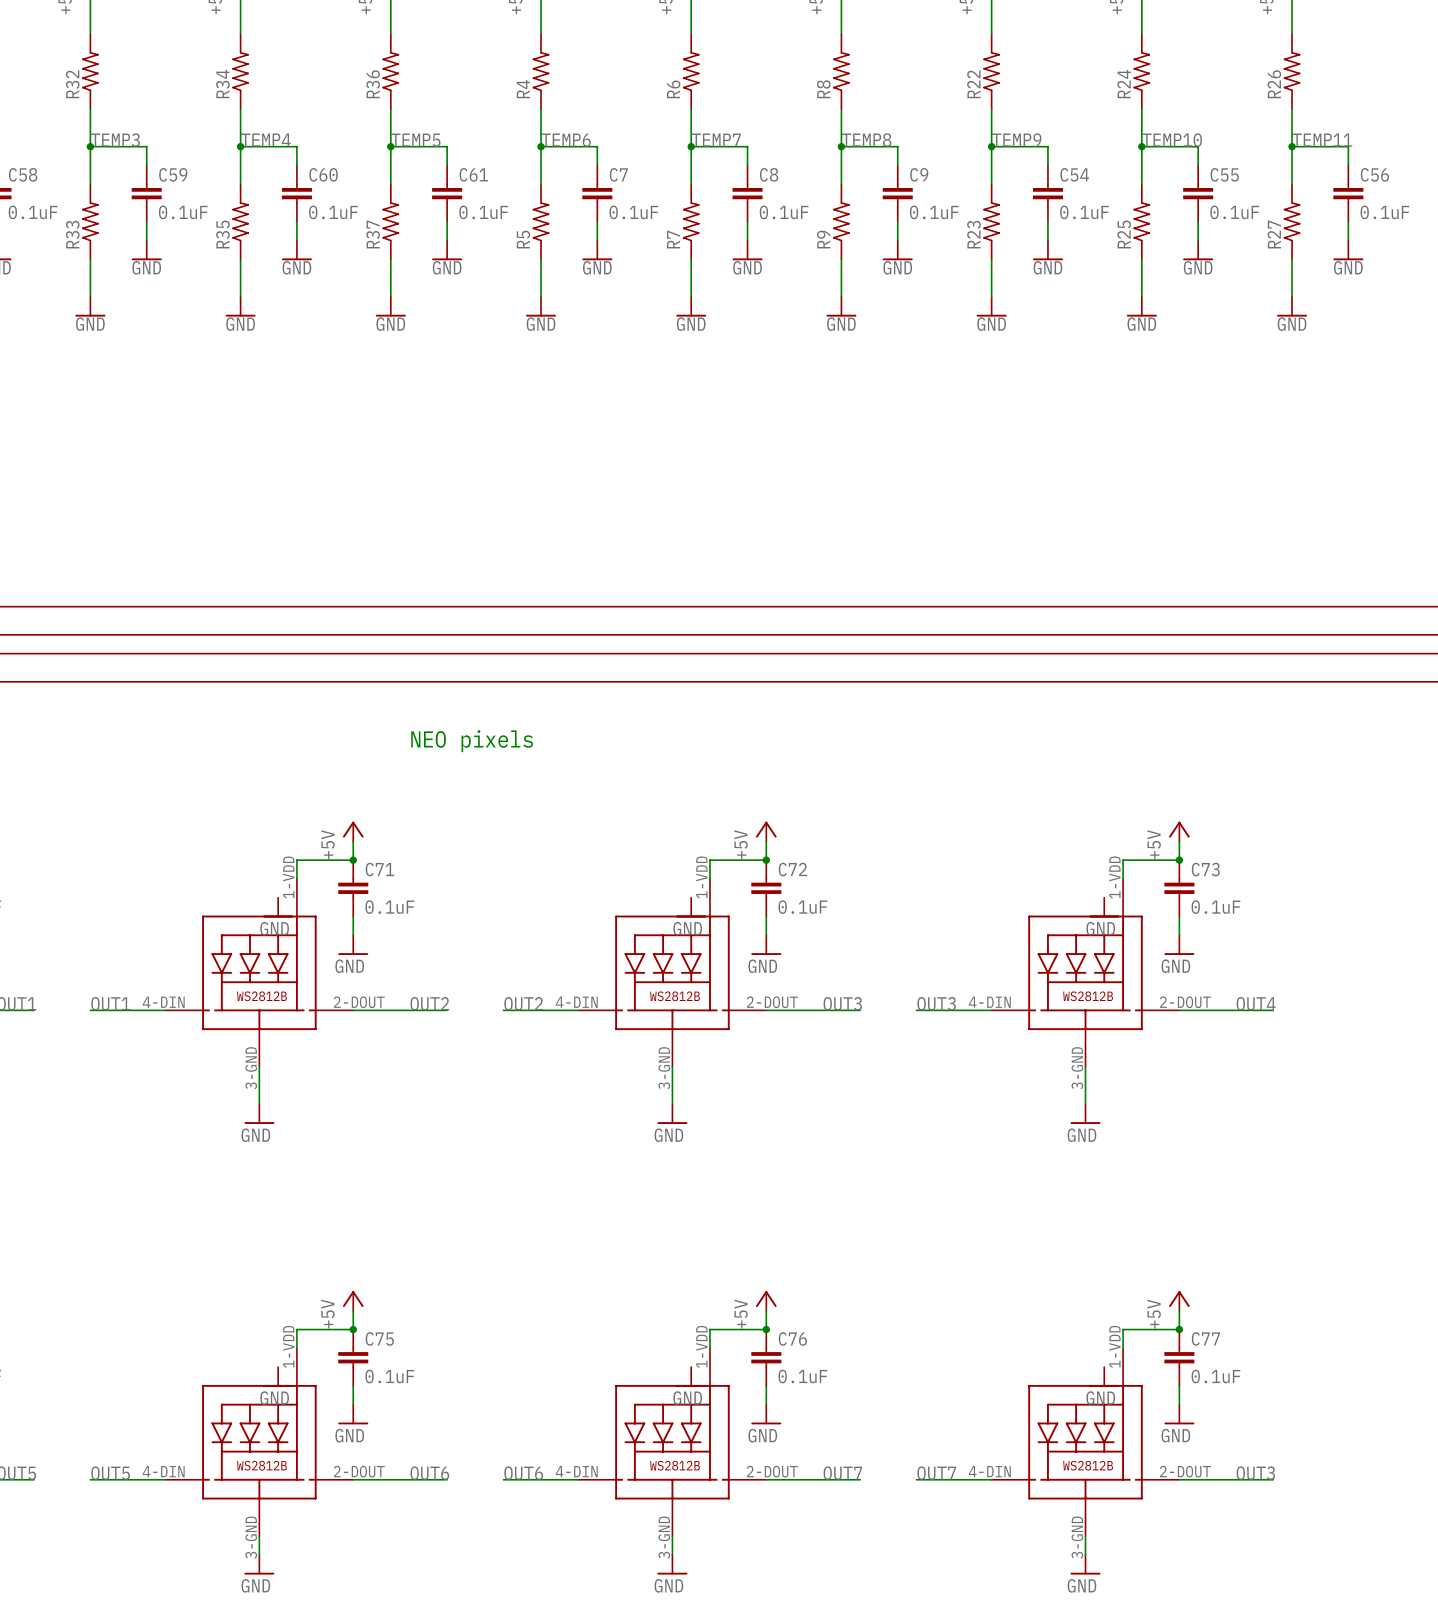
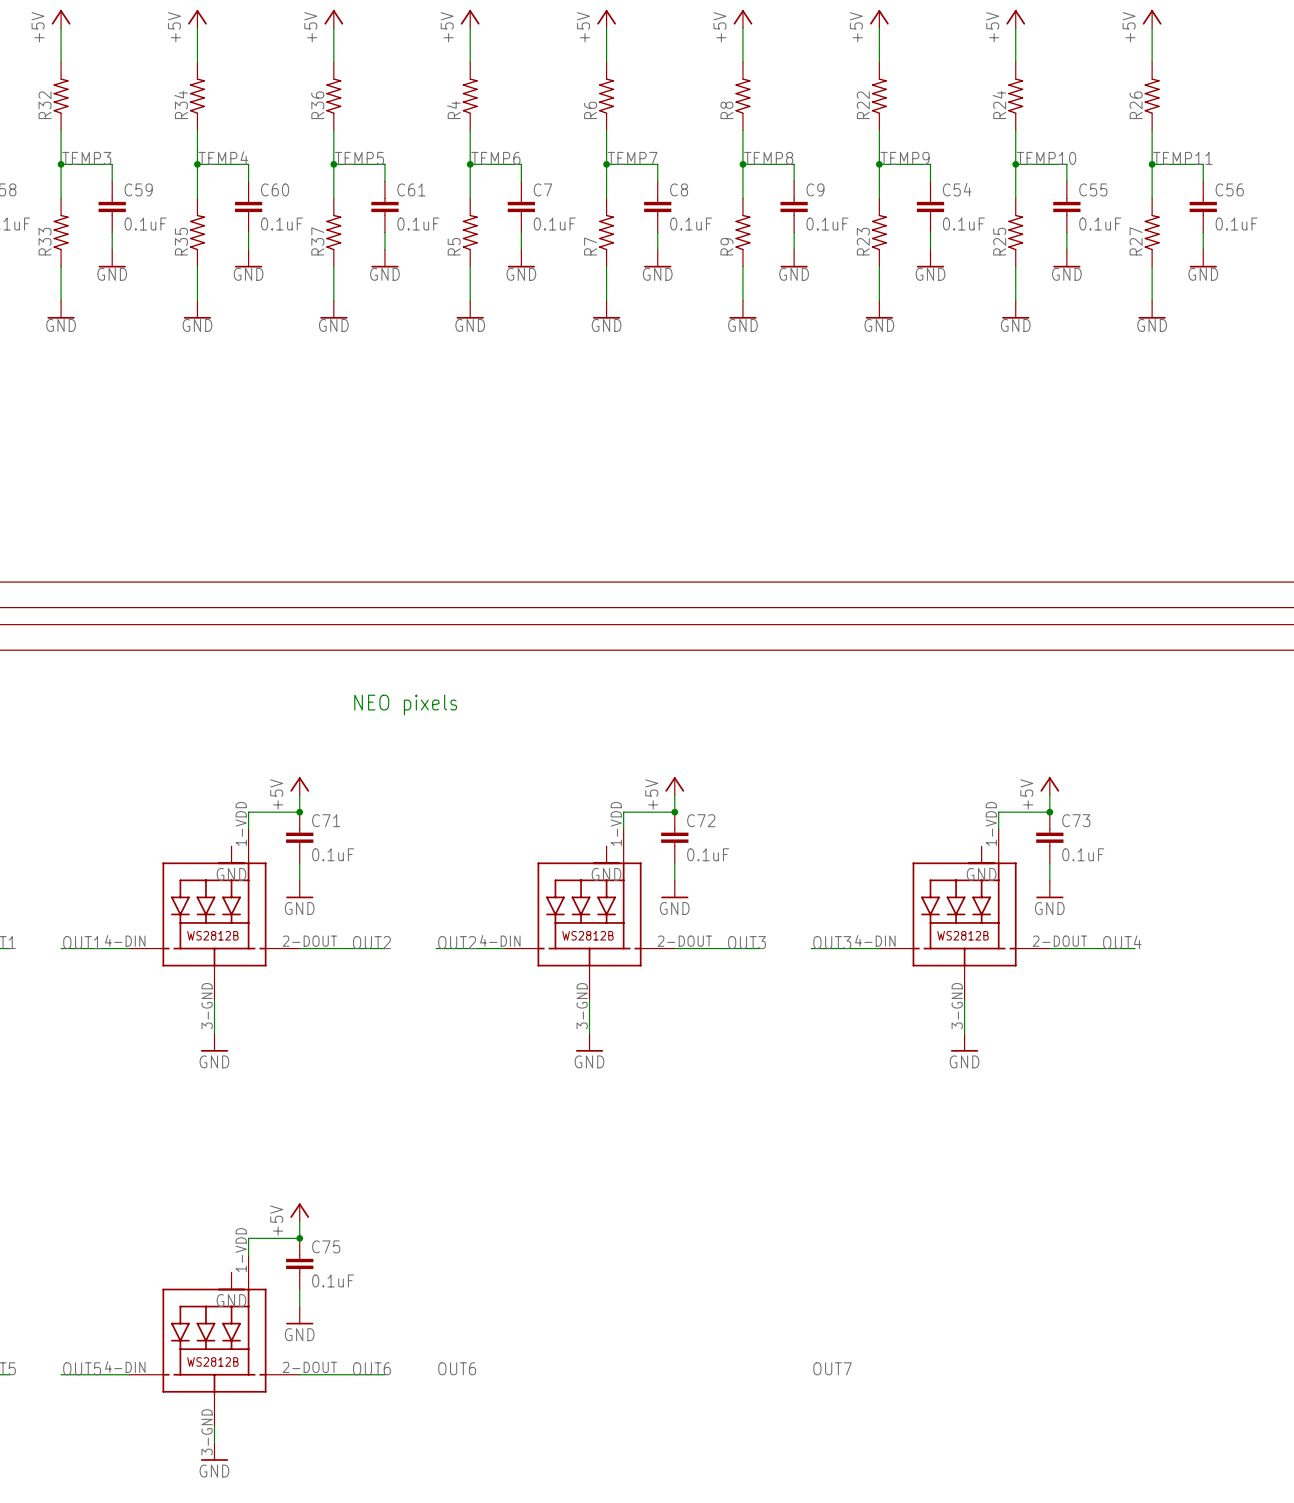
power symbol: +5V (766, 1300) -> none
power symbol: +5V (1179, 1300) -> none
wire: (766, 1310) (766, 1329) (709, 1329) (709, 1348) -> none
wire: (1179, 1310) (1179, 1329) (1123, 1329) (1123, 1348) -> none
junction: (766, 1329) -> none
junction: (1179, 1329) -> none
C76: 0.1uF (766, 1357) -> none
C77: 0.1uF (1179, 1357) -> none
power symbol: GND (691, 1376) -> none
power symbol: GND (1104, 1376) -> none
wire: (766, 1385) (766, 1404) -> none
wire: (1179, 1385) (1179, 1404) -> none
power symbol: GND (766, 1414) -> none
power symbol: GND (1179, 1414) -> none
part: (672, 1442) -> none
part: (1085, 1442) -> none
label: OUT7 (842, 1473) -> none
label: OUT3 (1255, 1473) -> none
wire: (503, 1479) (578, 1479) -> none
wire: (766, 1479) (860, 1479) -> none
wire: (916, 1479) (991, 1479) -> none
wire: (1179, 1479) (1273, 1479) -> none
wire: (672, 1536) (672, 1554) -> none
wire: (1085, 1536) (1085, 1554) -> none
power symbol: GND (672, 1564) -> none
power symbol: GND (1085, 1564) -> none

